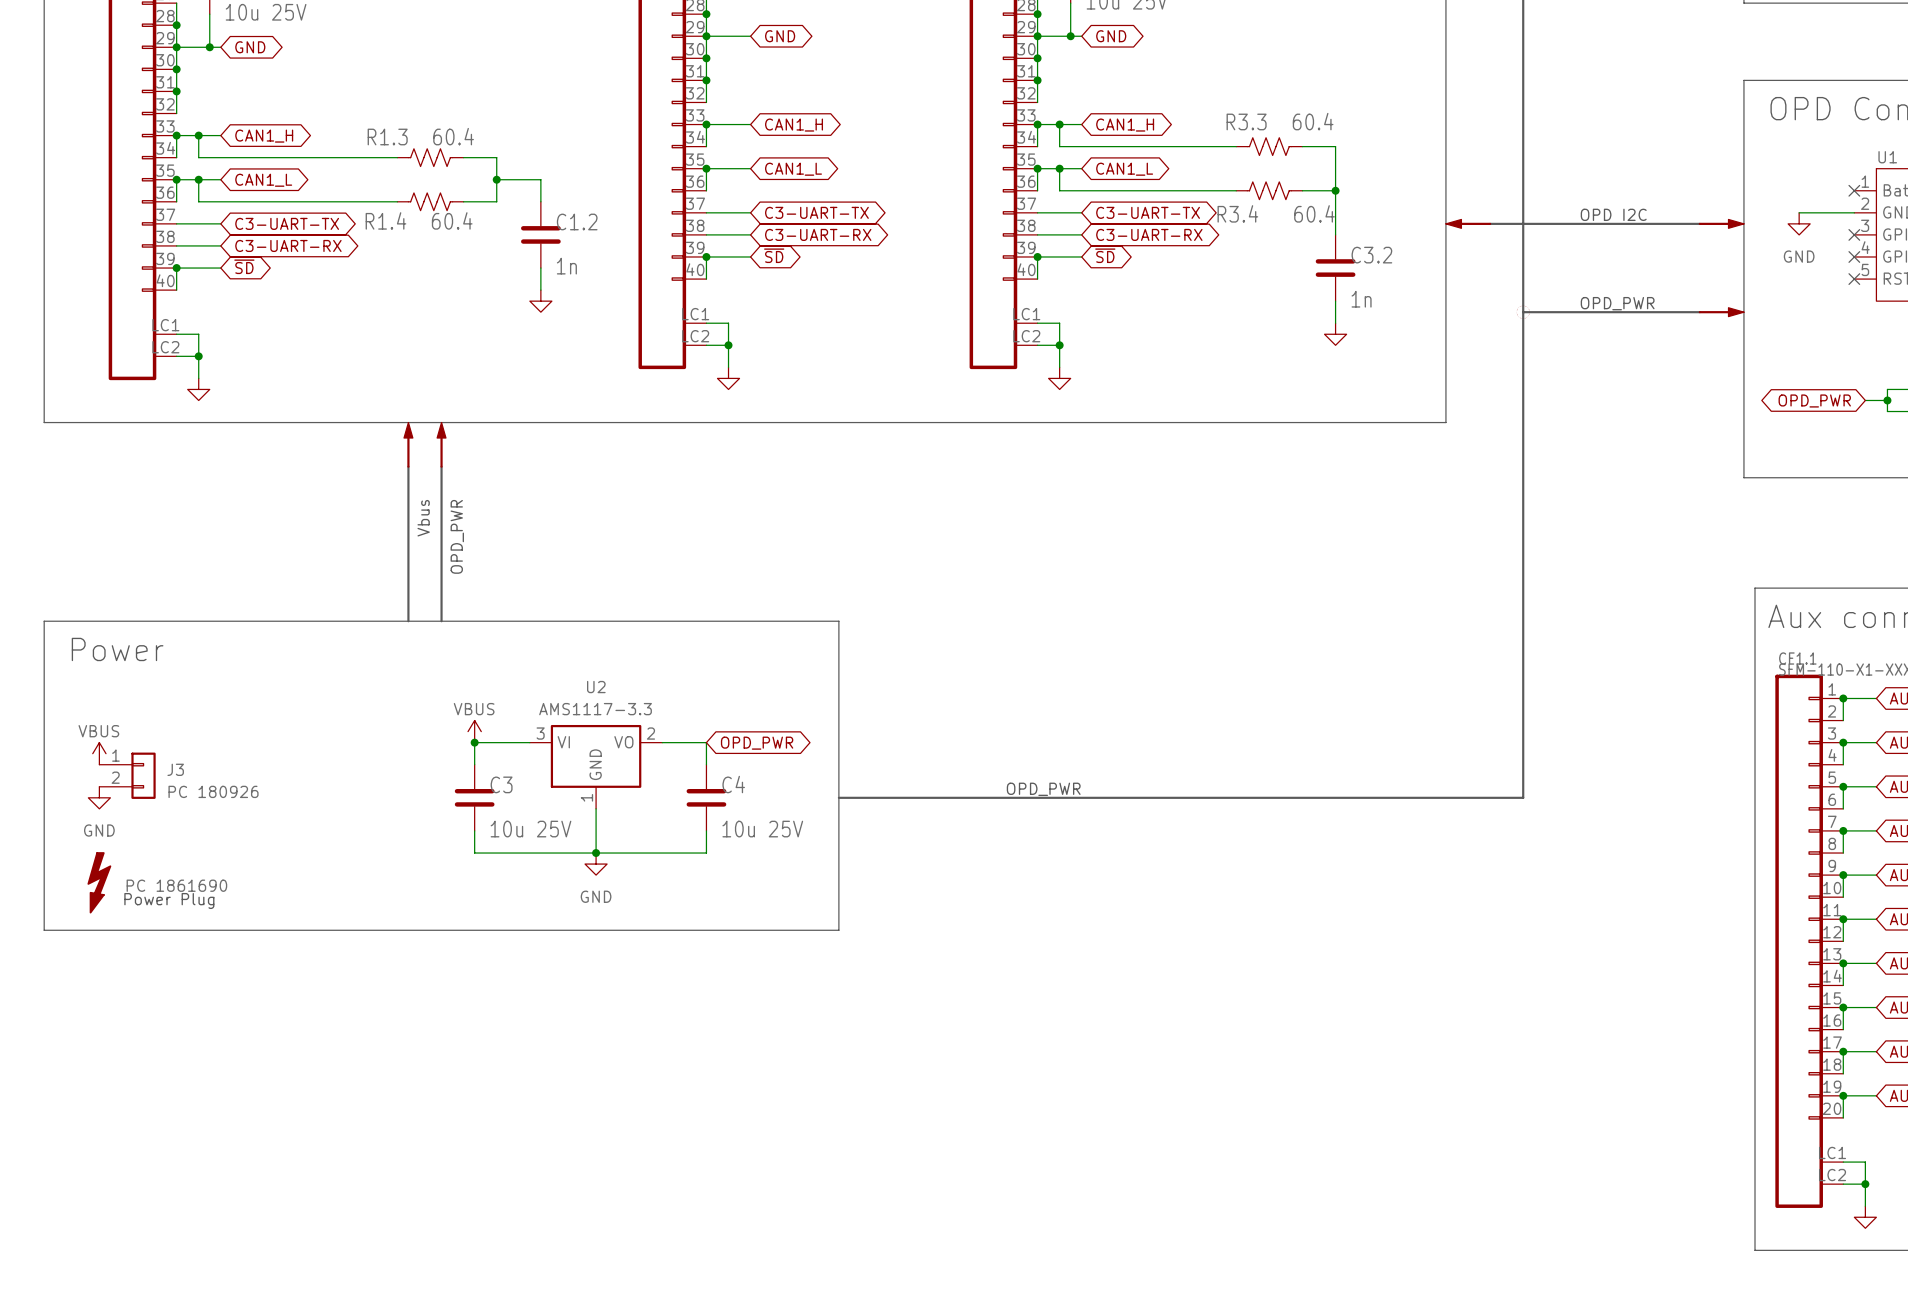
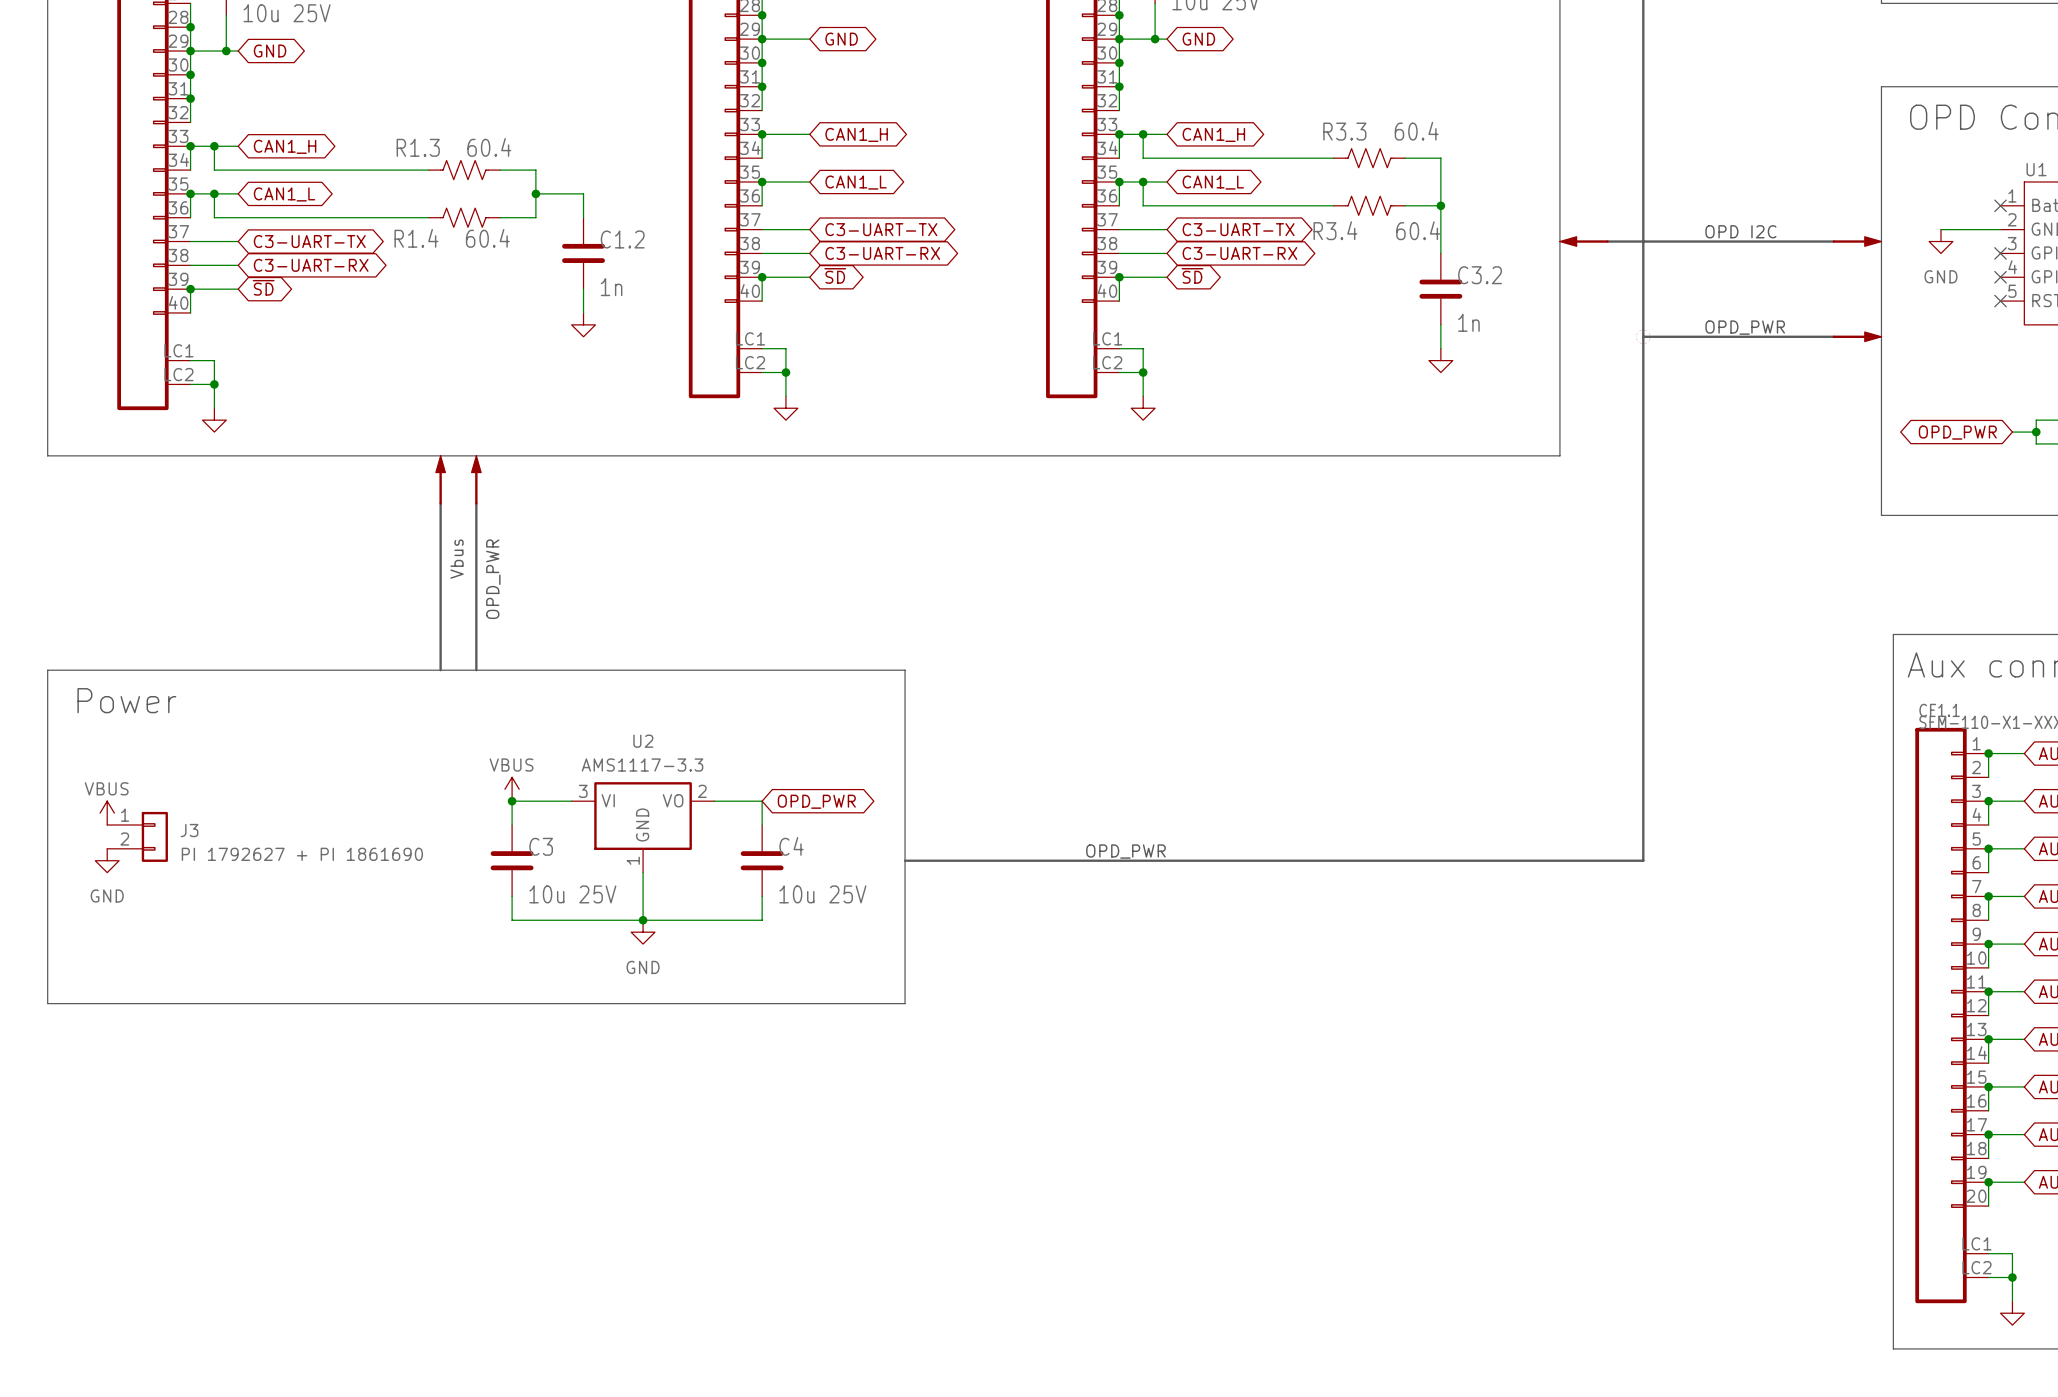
J3 value: PC 180926 (213, 791) -> PI 1792627 + PI 1861690 (302, 854)
part: PC 1861690 (99, 882) -> none
text: Power Plug (169, 901) -> none

